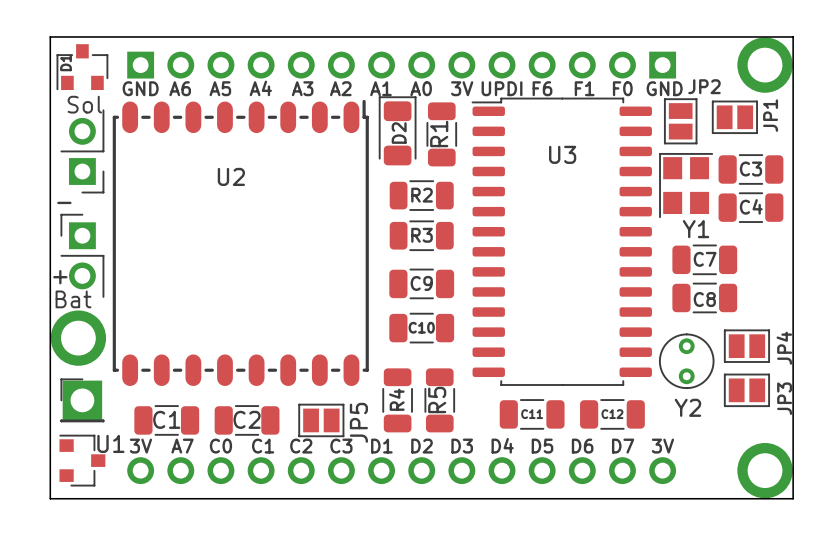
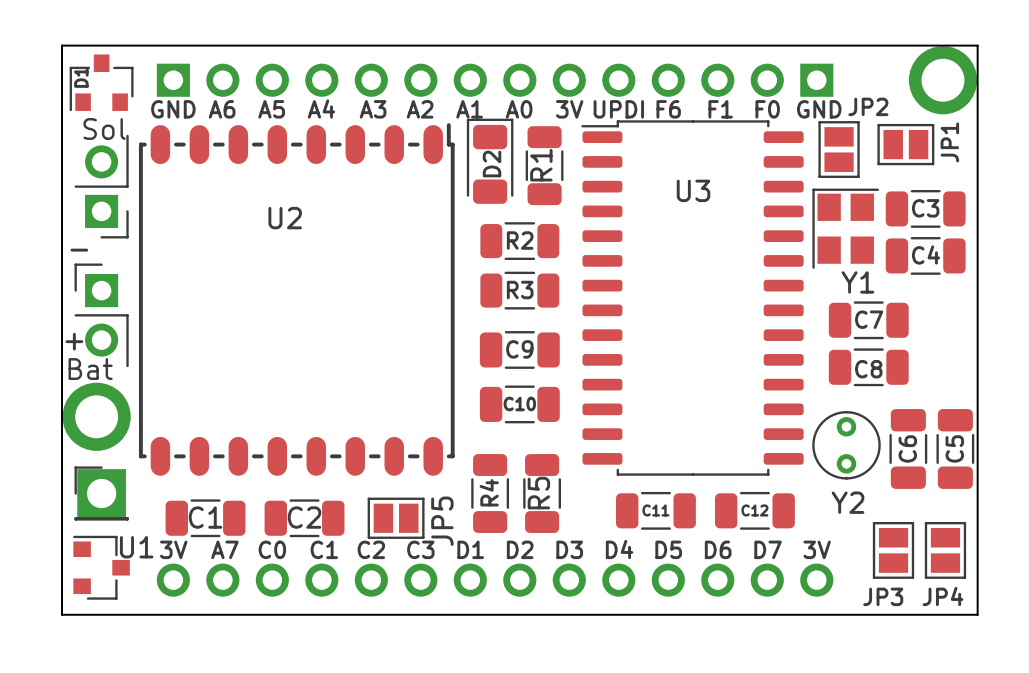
JP4 rotation: 0° (746, 346) -> 90° clockwise (945, 550)
JP4 position: (746, 346) -> (945, 550)
C6: none -> (908, 448)
C5: none -> (955, 448)
JP3 rotation: 0° (746, 390) -> 90° clockwise (893, 550)
JP3 position: (746, 390) -> (893, 550)
part: (765, 470) -> none

